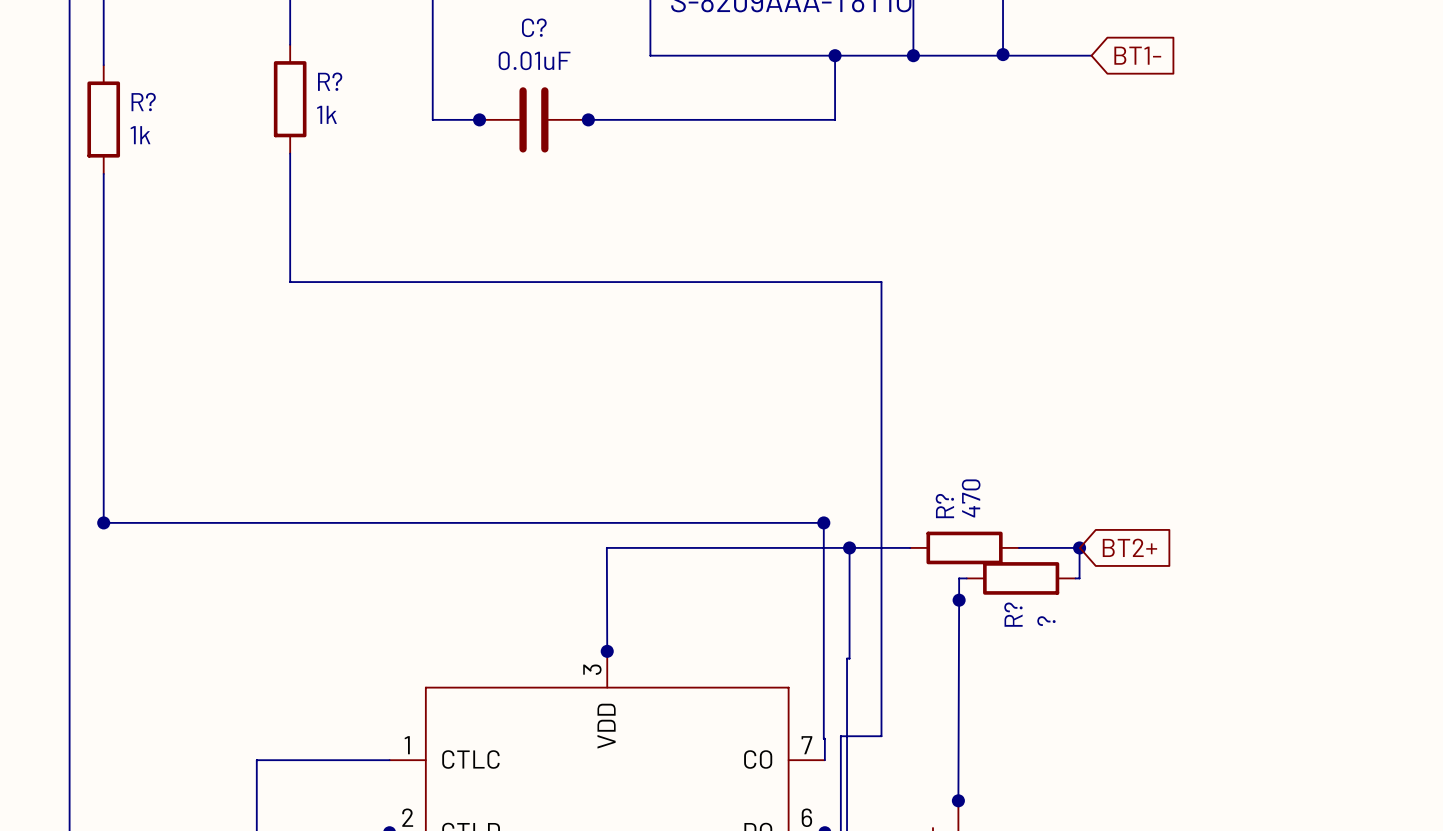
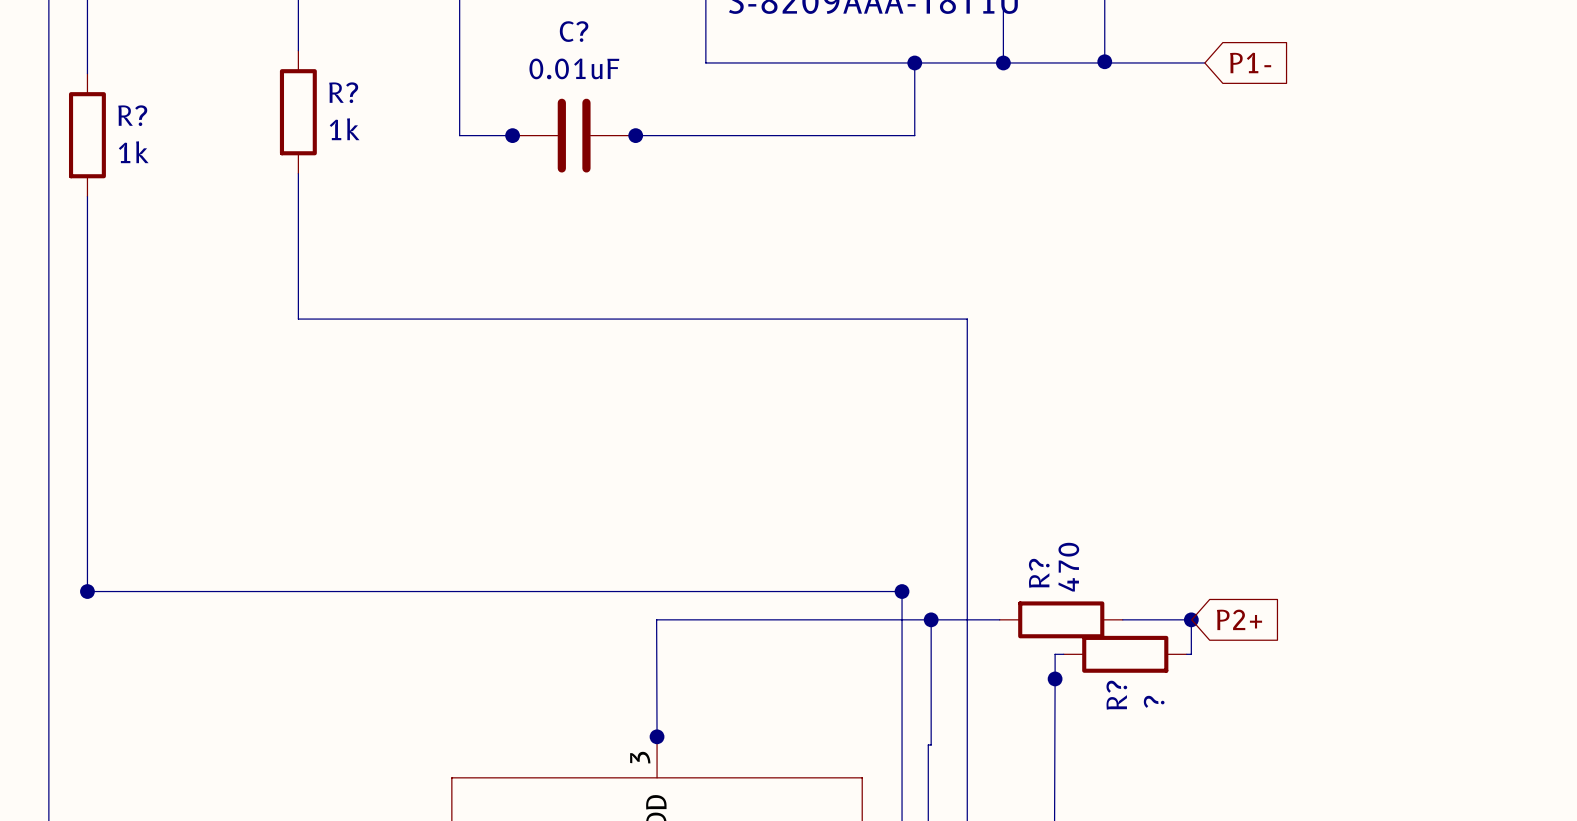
global label: BT1- (1137, 55) -> P1- (1250, 62)
global label: BT2+ (1129, 547) -> P2+ (1239, 619)

